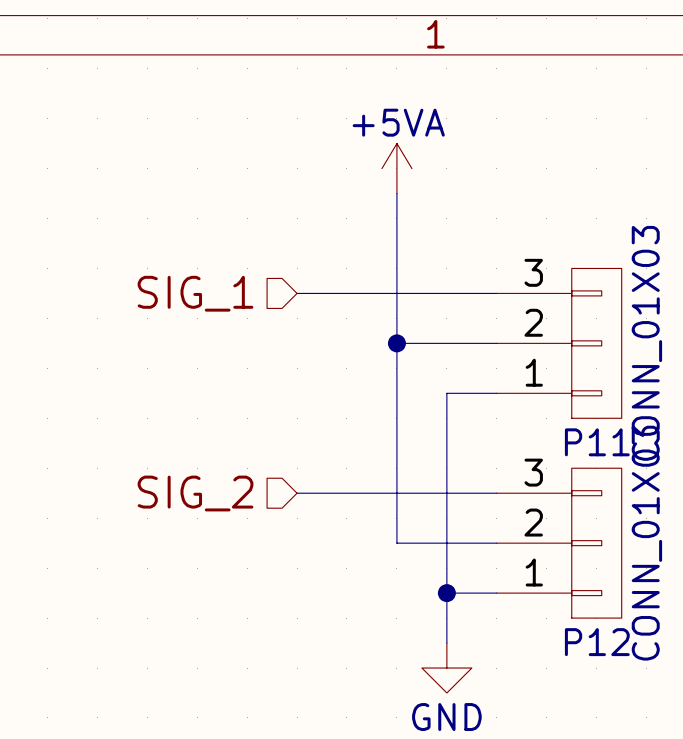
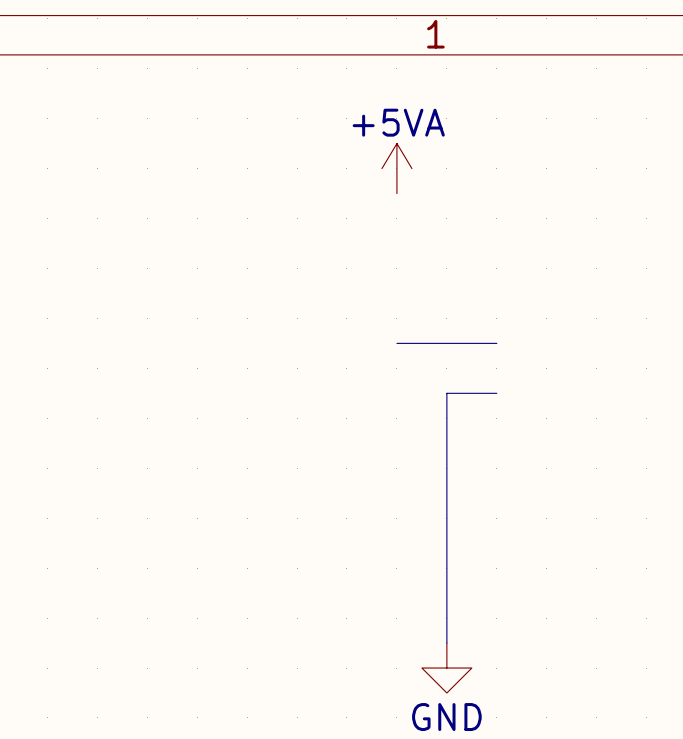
wire: (396, 193) (396, 543) (496, 543) -> none
hierarchical label: SIG_1 (195, 293) -> none
wire: (297, 293) (496, 293) -> none
junction: (396, 343) -> none
P11: CONN_01X03 (559, 343) -> none
hierarchical label: SIG_2 (195, 493) -> none
wire: (297, 493) (496, 493) -> none
P12: CONN_01X03 (559, 543) -> none
wire: (446, 593) (496, 593) -> none
junction: (446, 593) -> none

